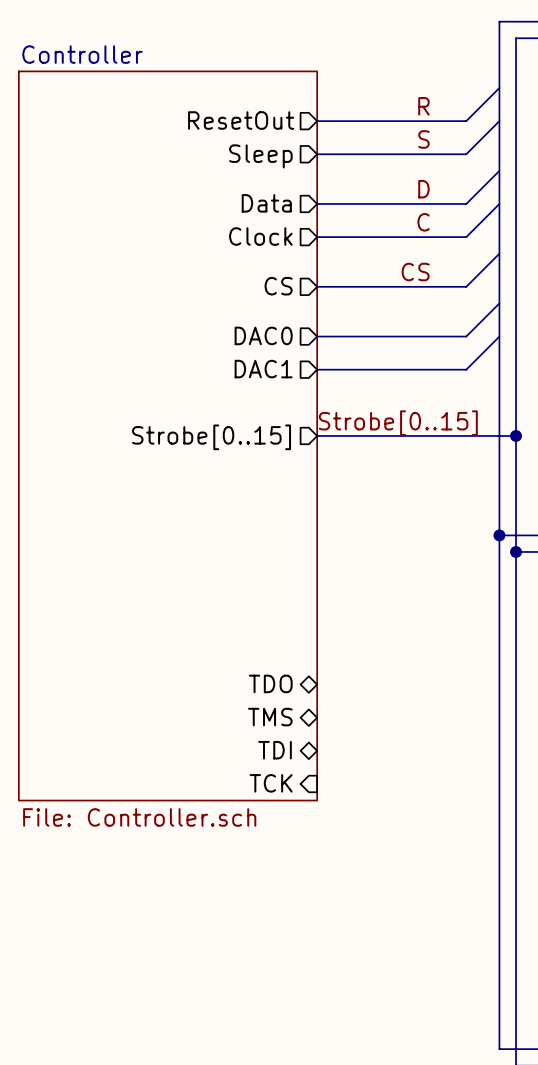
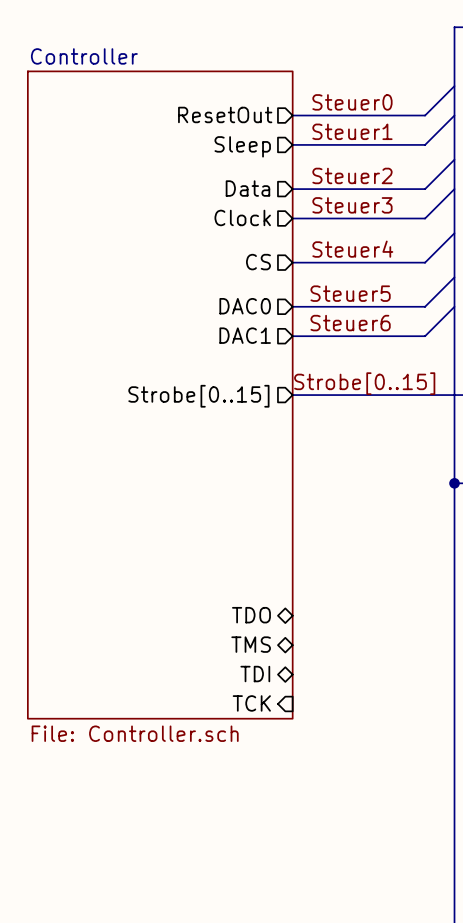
label: R (423, 106) -> Steuer0 (352, 102)
label: S (423, 139) -> Steuer1 (352, 131)
label: D (423, 189) -> Steuer2 (352, 175)
label: C (423, 222) -> Steuer3 (352, 205)
label: CS (415, 272) -> Steuer4 (352, 249)
label: none -> Steuer5 (350, 293)
label: none -> Steuer6 (350, 323)

